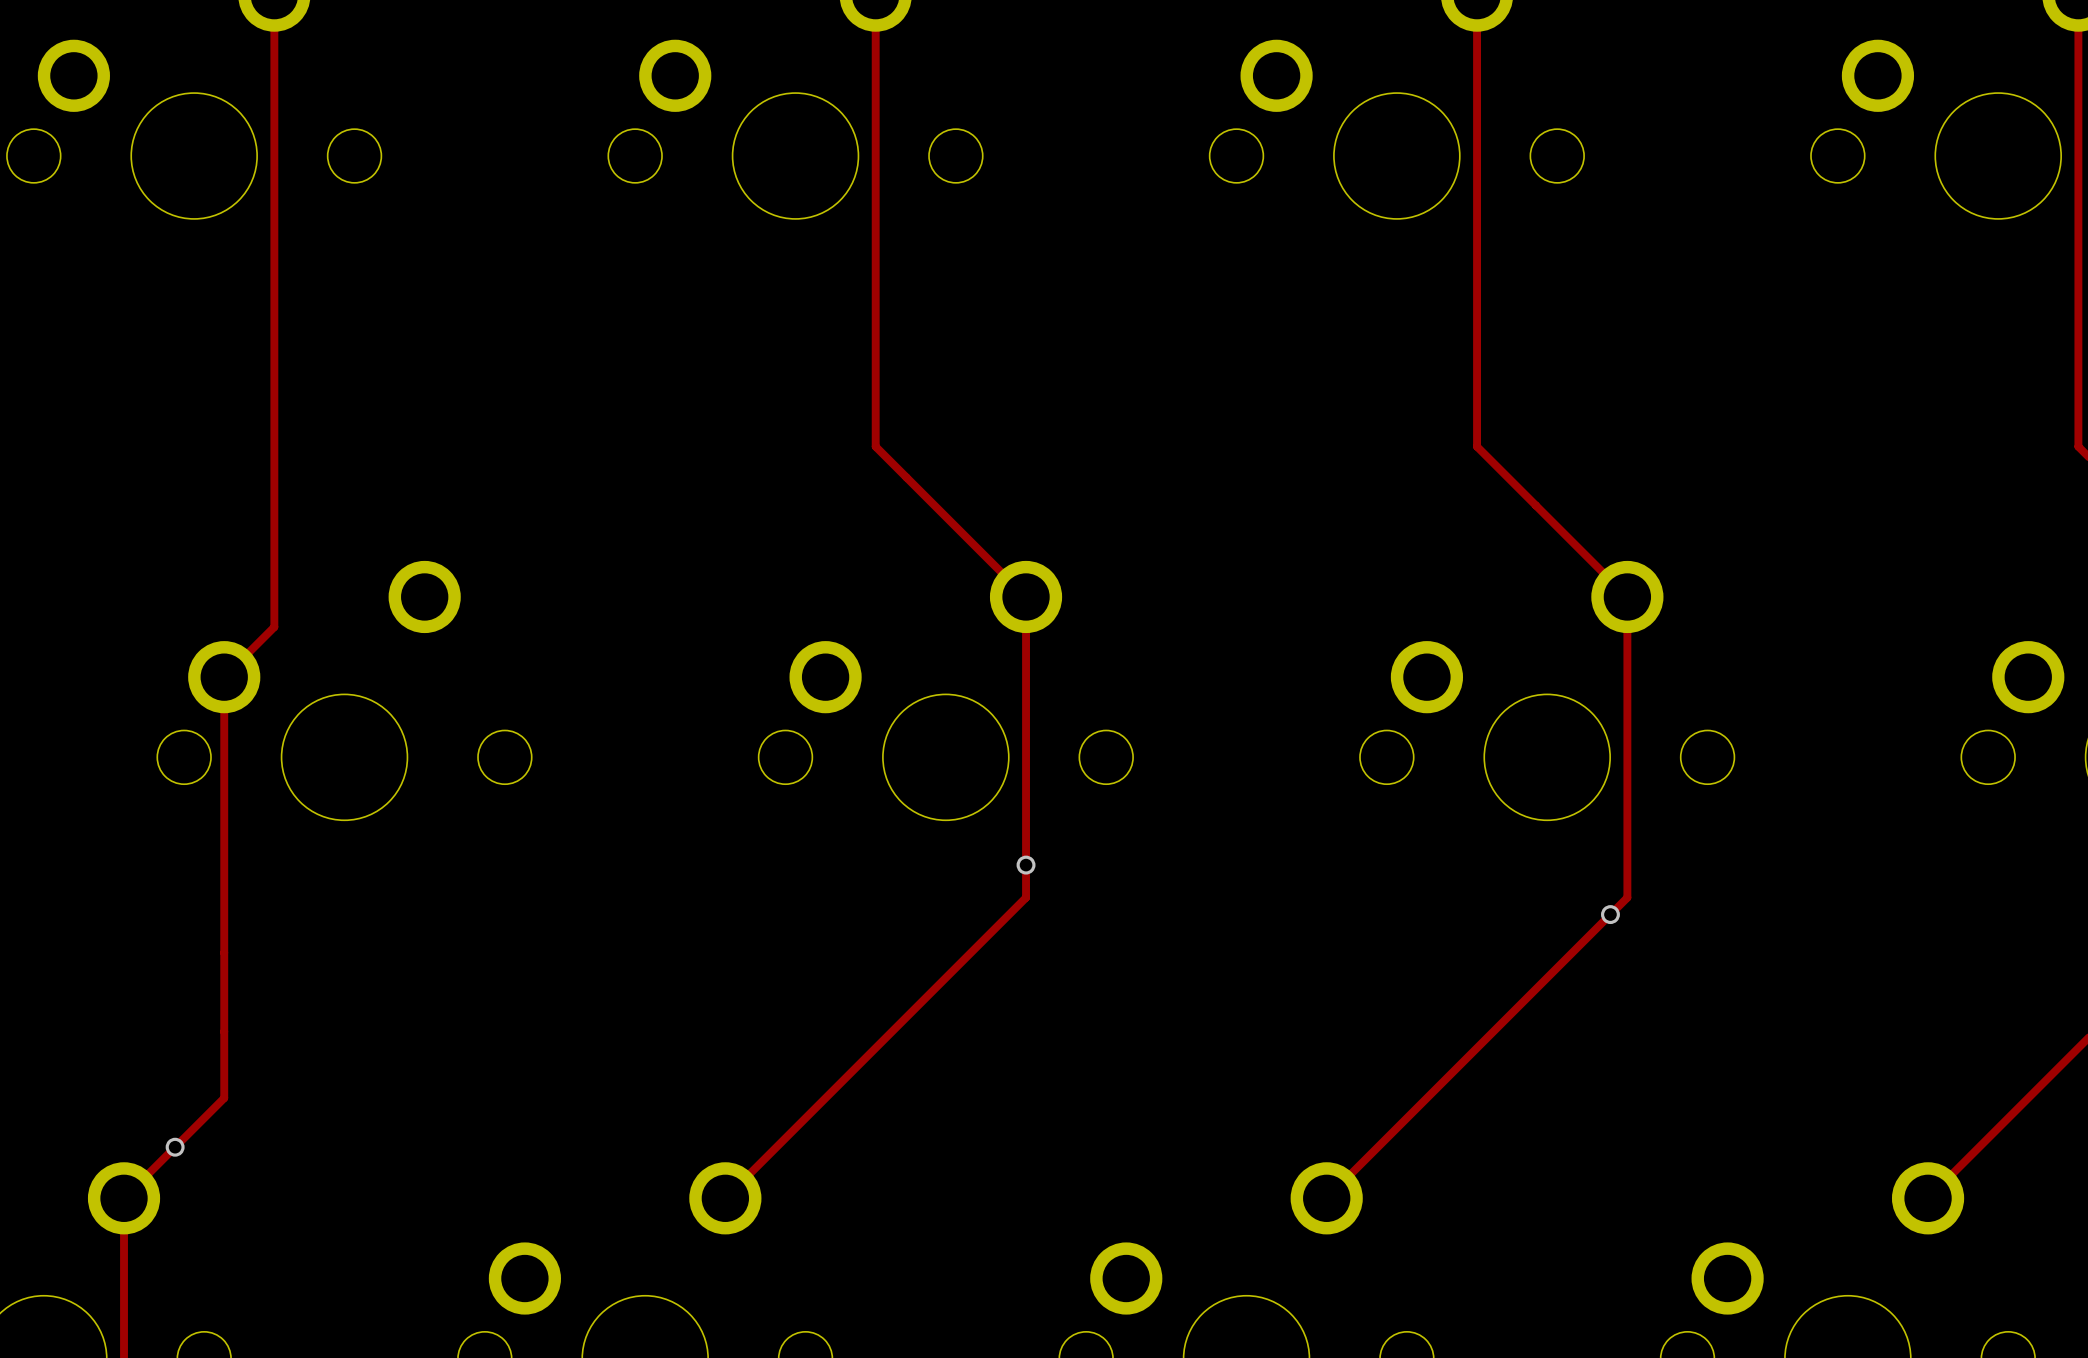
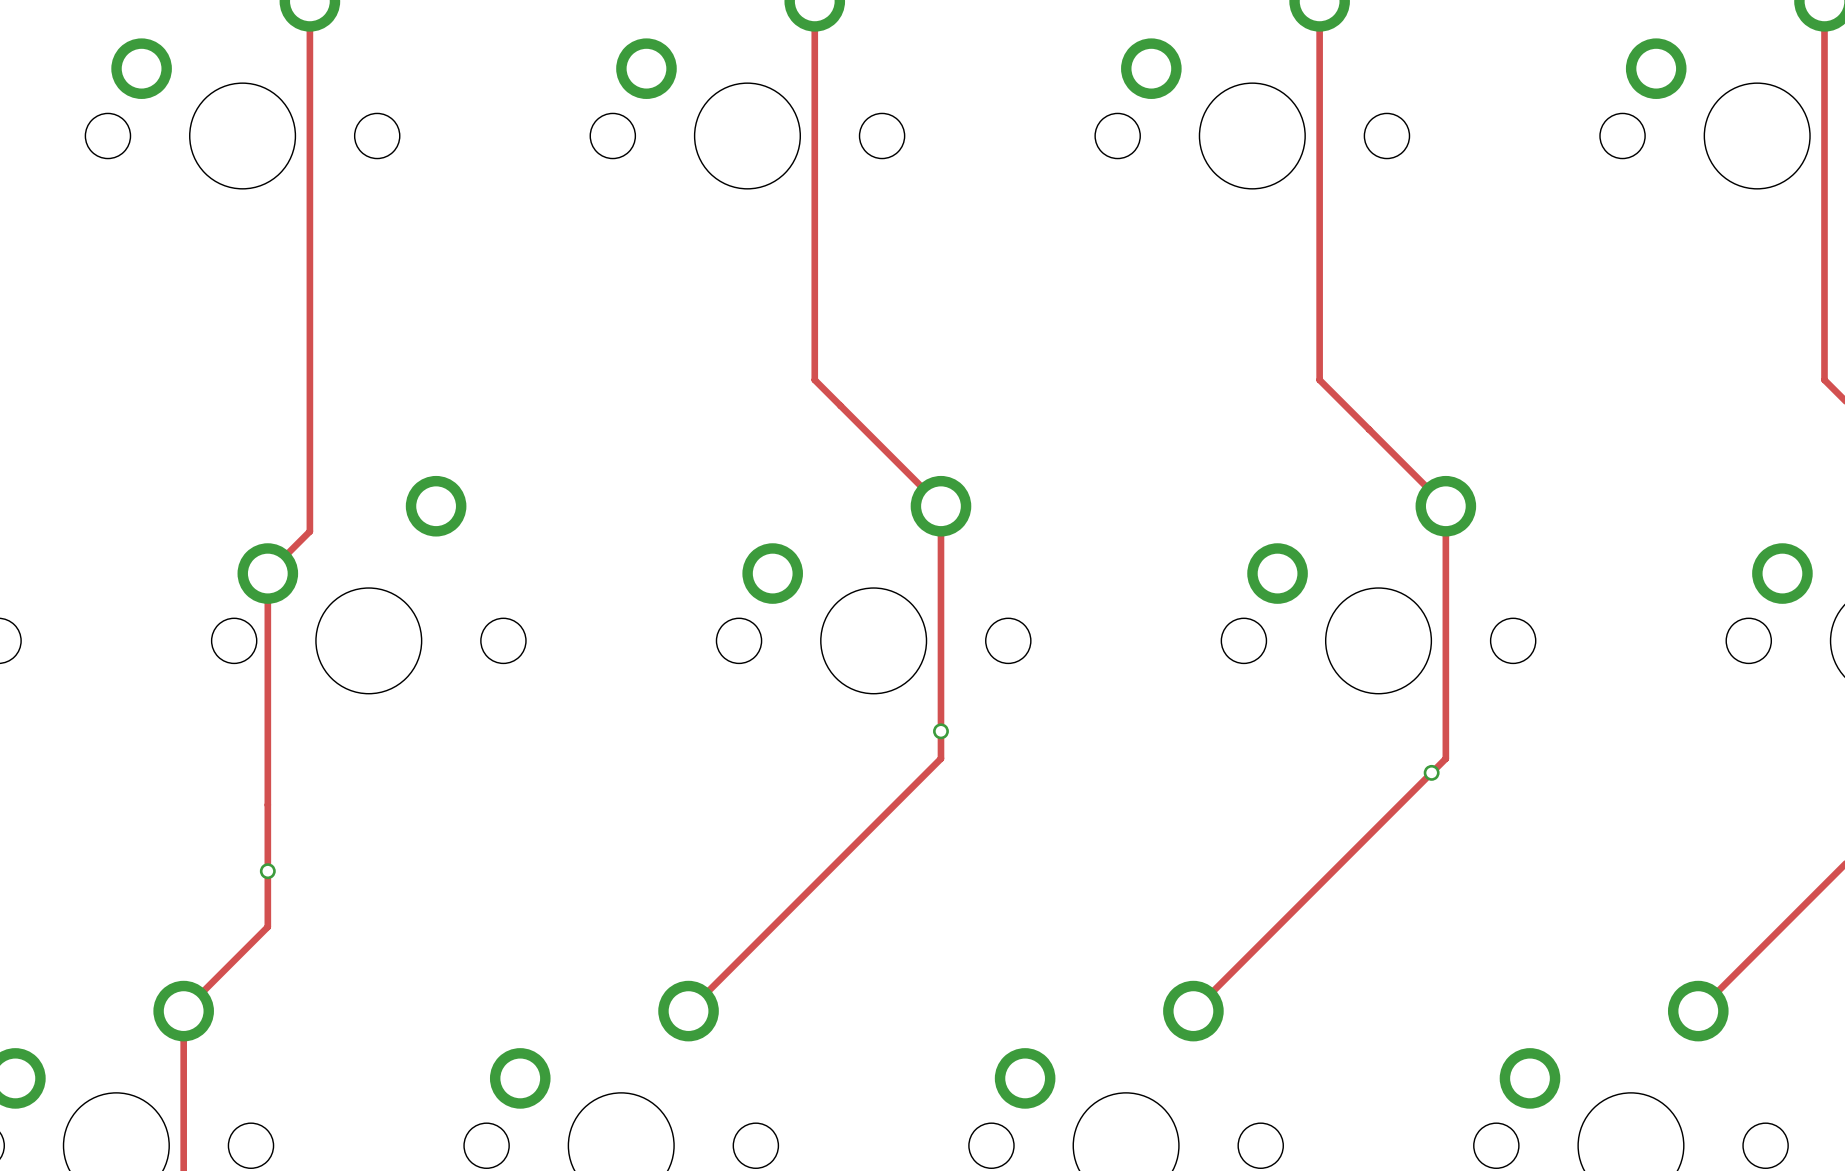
via position: (175, 1147) -> (267, 871)

